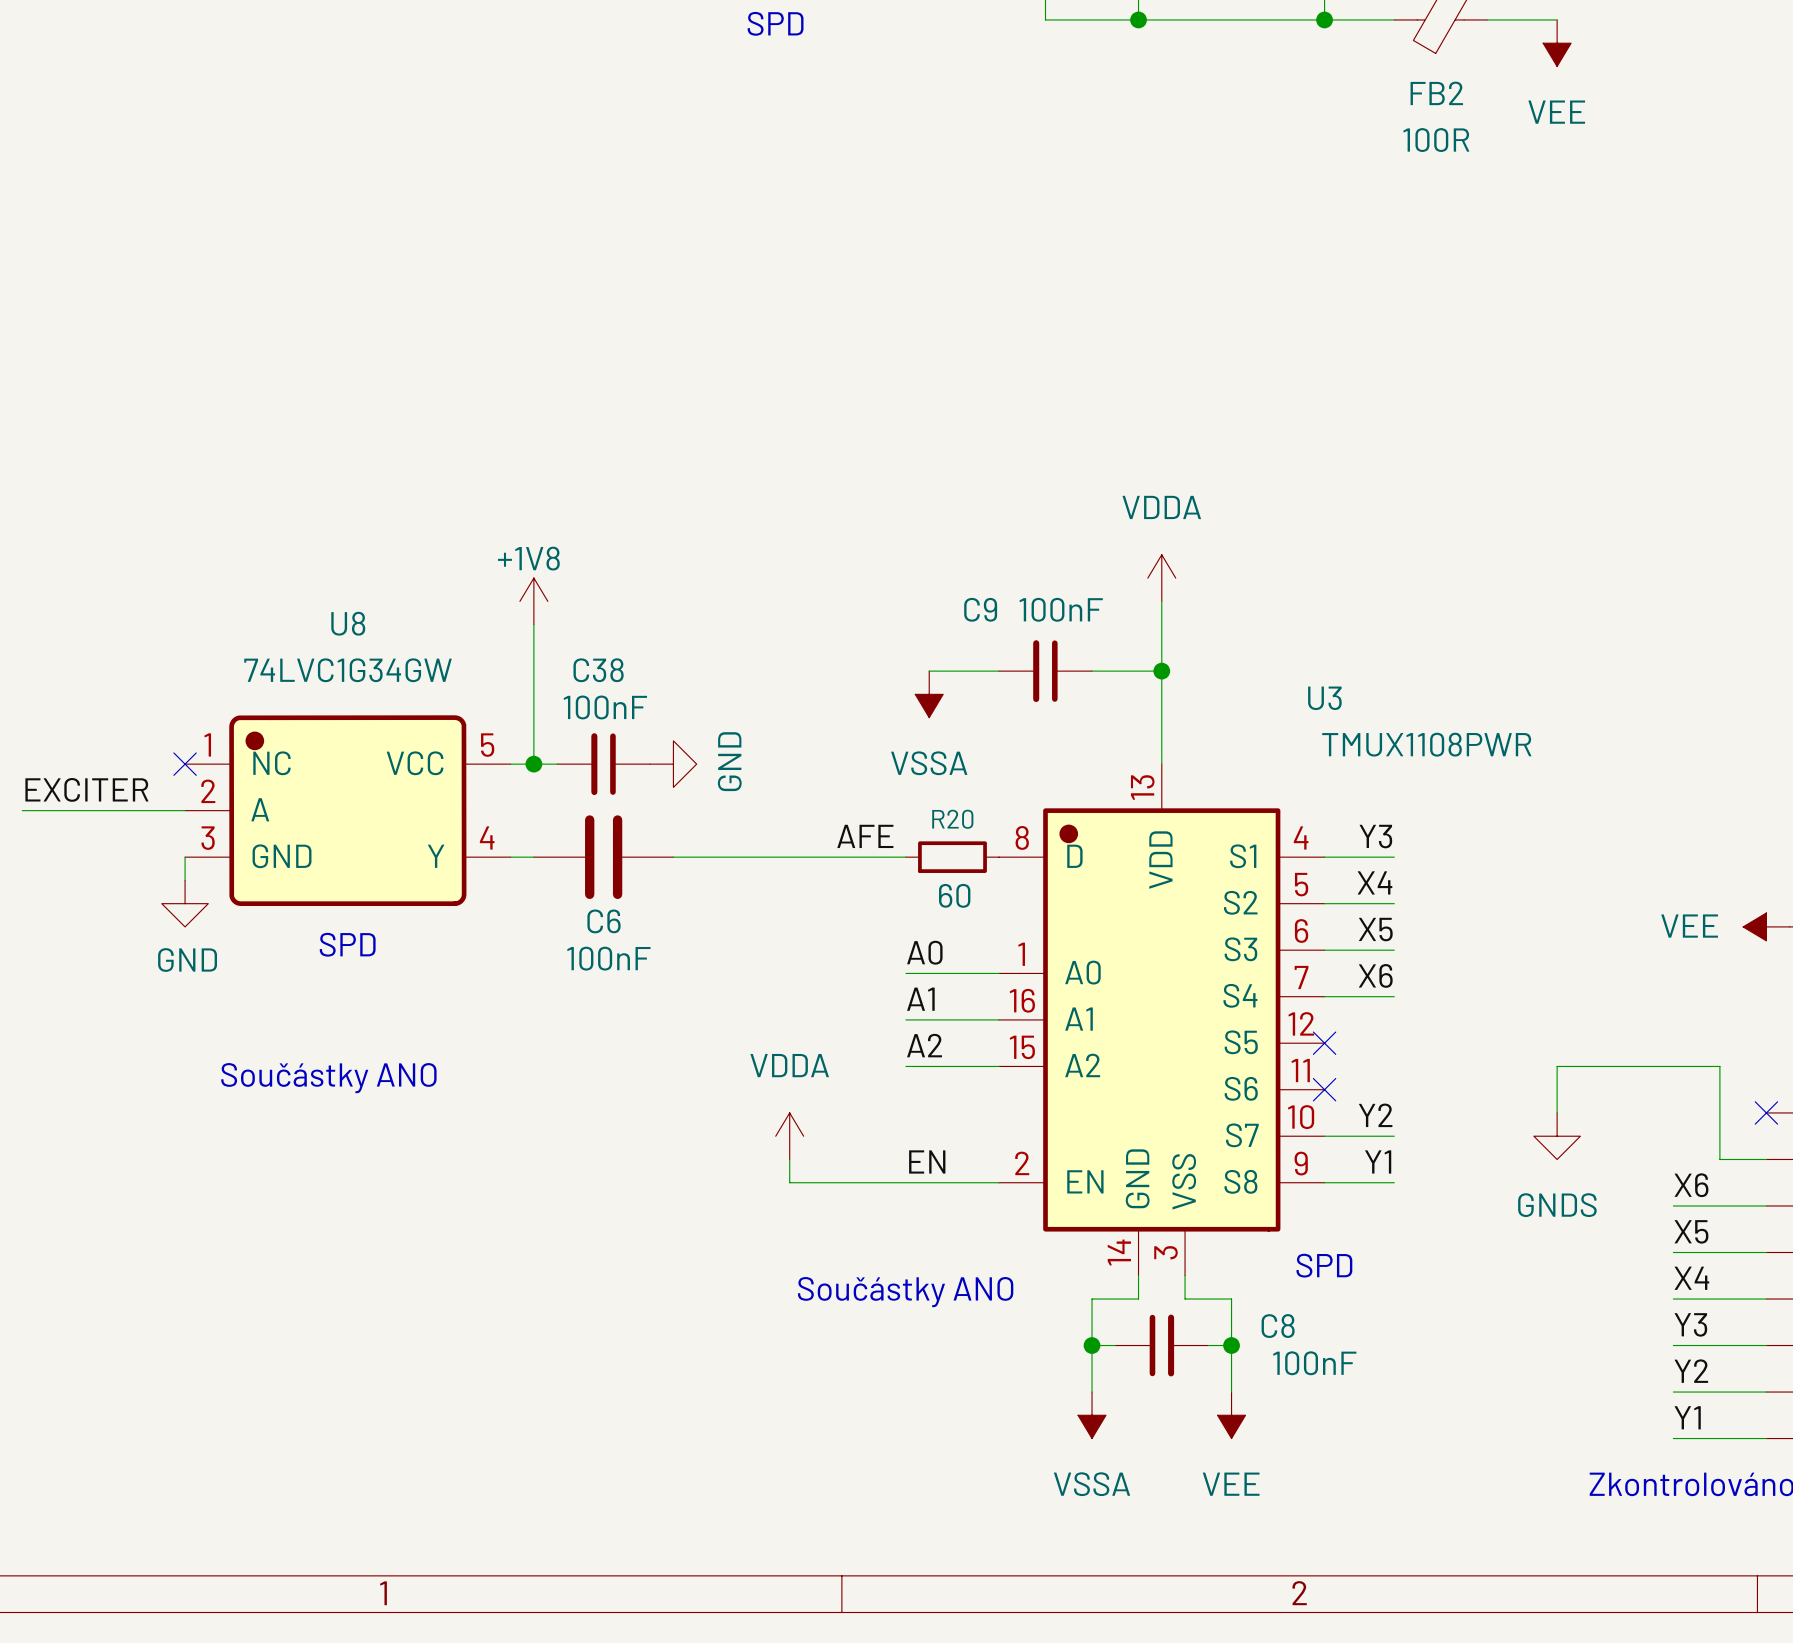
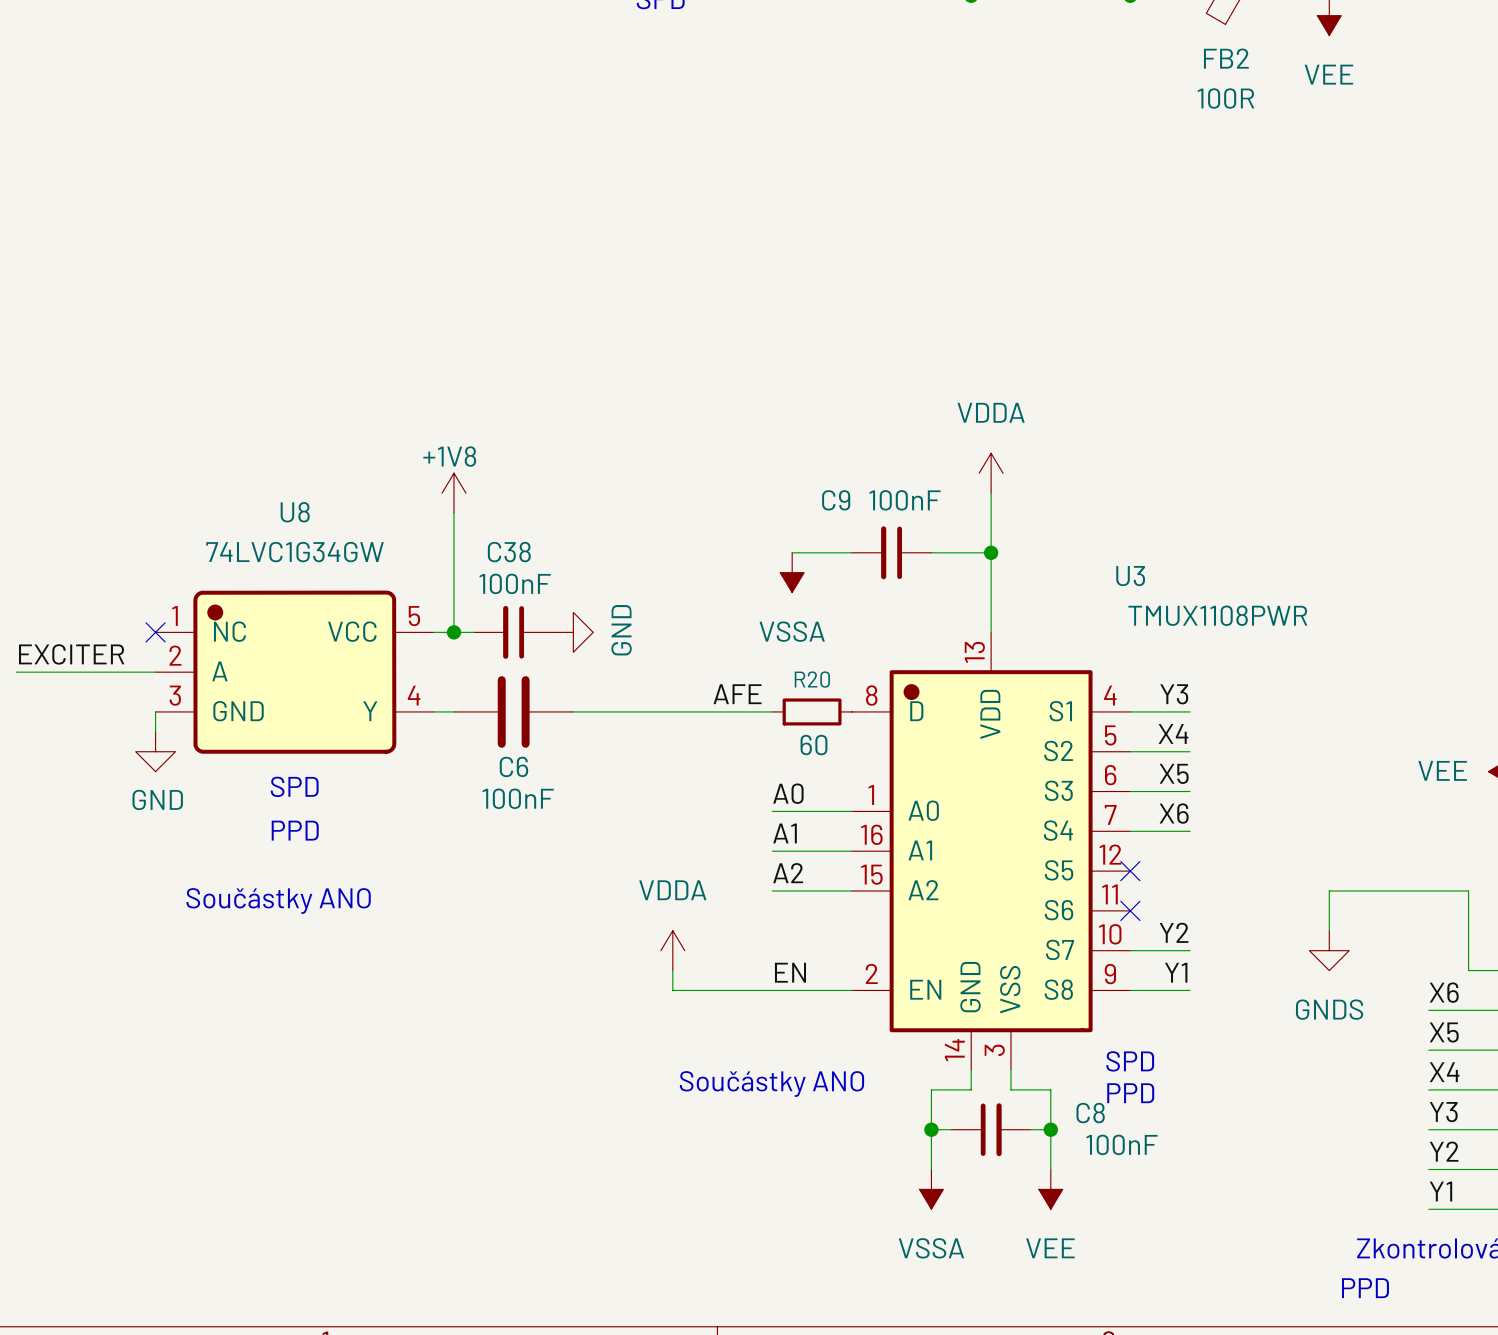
text: none -> PPD (295, 830)
text: none -> PPD (1130, 1093)
text: none -> PPD (1365, 1288)

